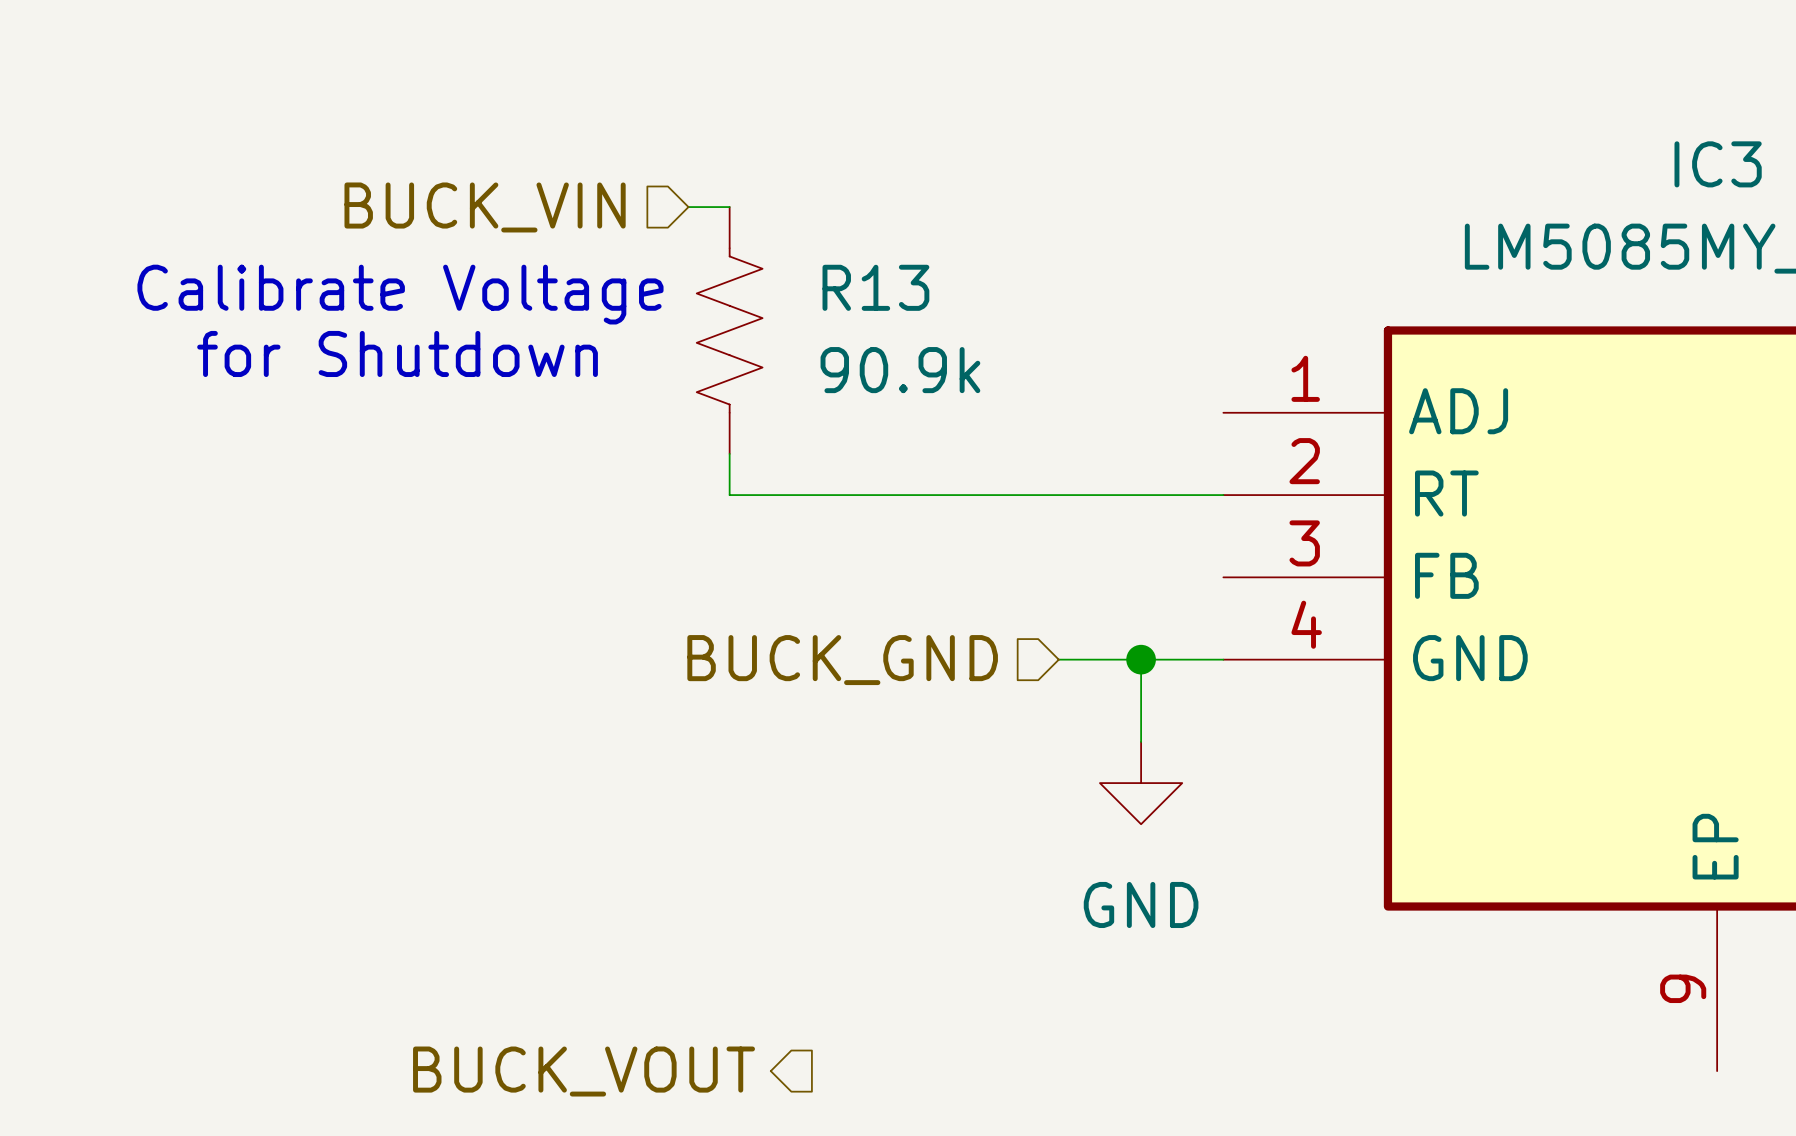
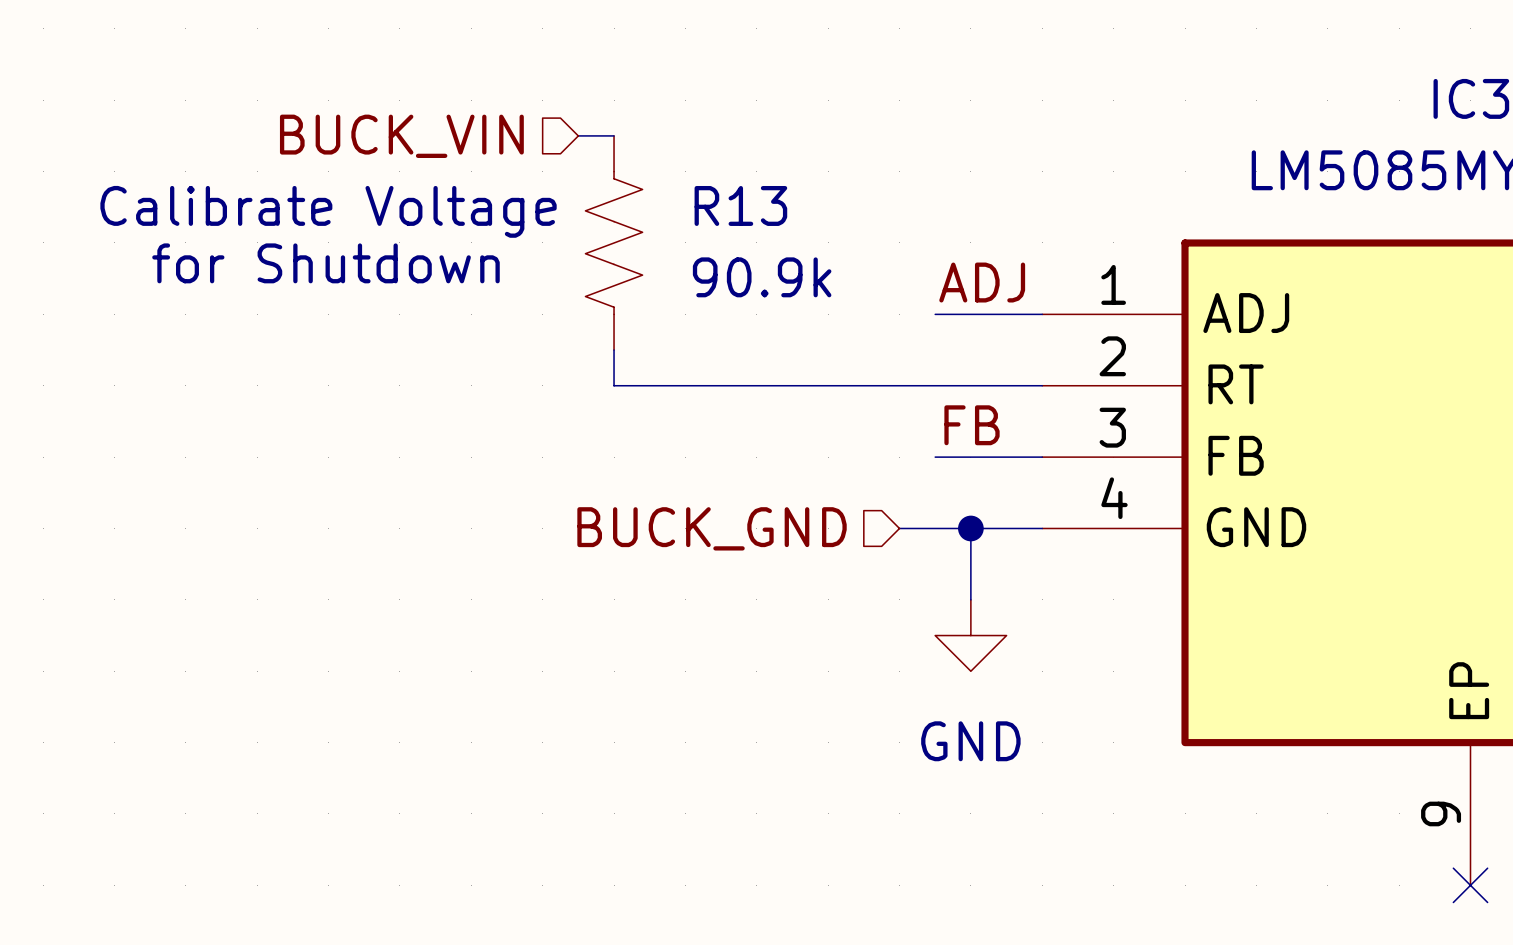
label: none -> ADJ (982, 282)
wire: none -> (935, 314) (1042, 314)
label: none -> FB (972, 425)
wire: none -> (935, 457) (1042, 457)
hierarchical label: BUCK_VOUT (584, 1071) -> none
no-connect mark: none -> (1470, 885)

